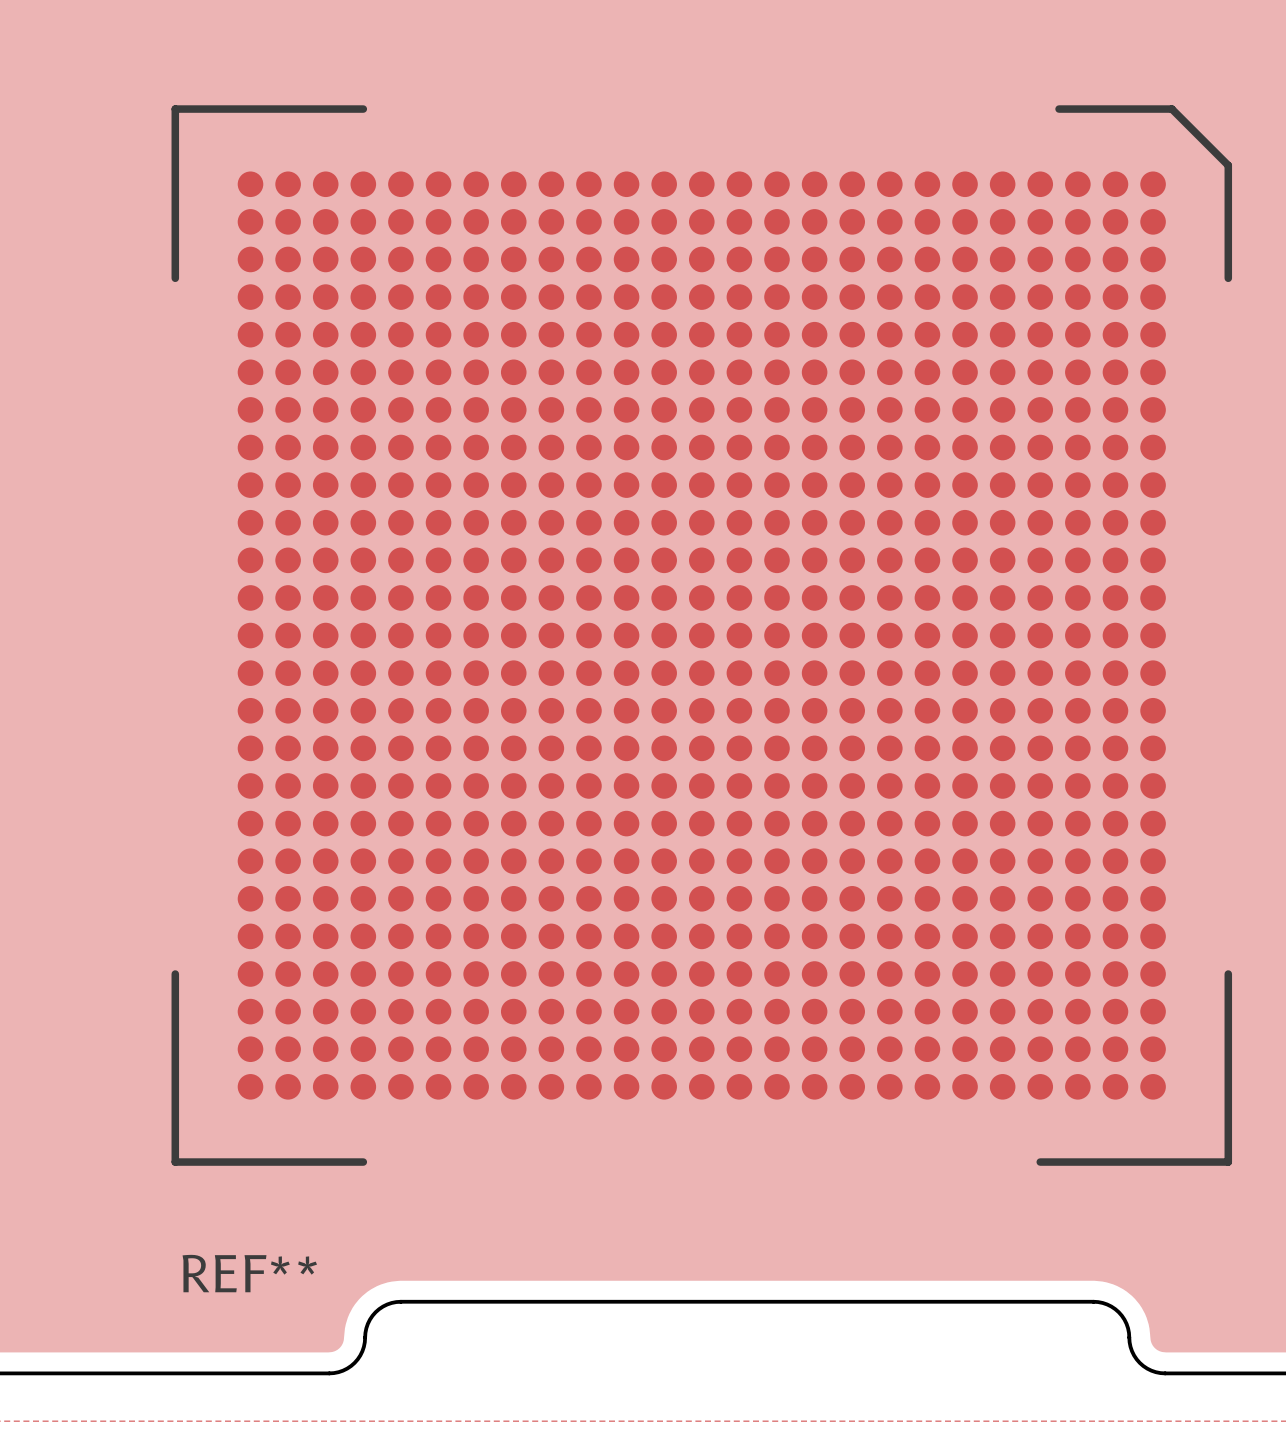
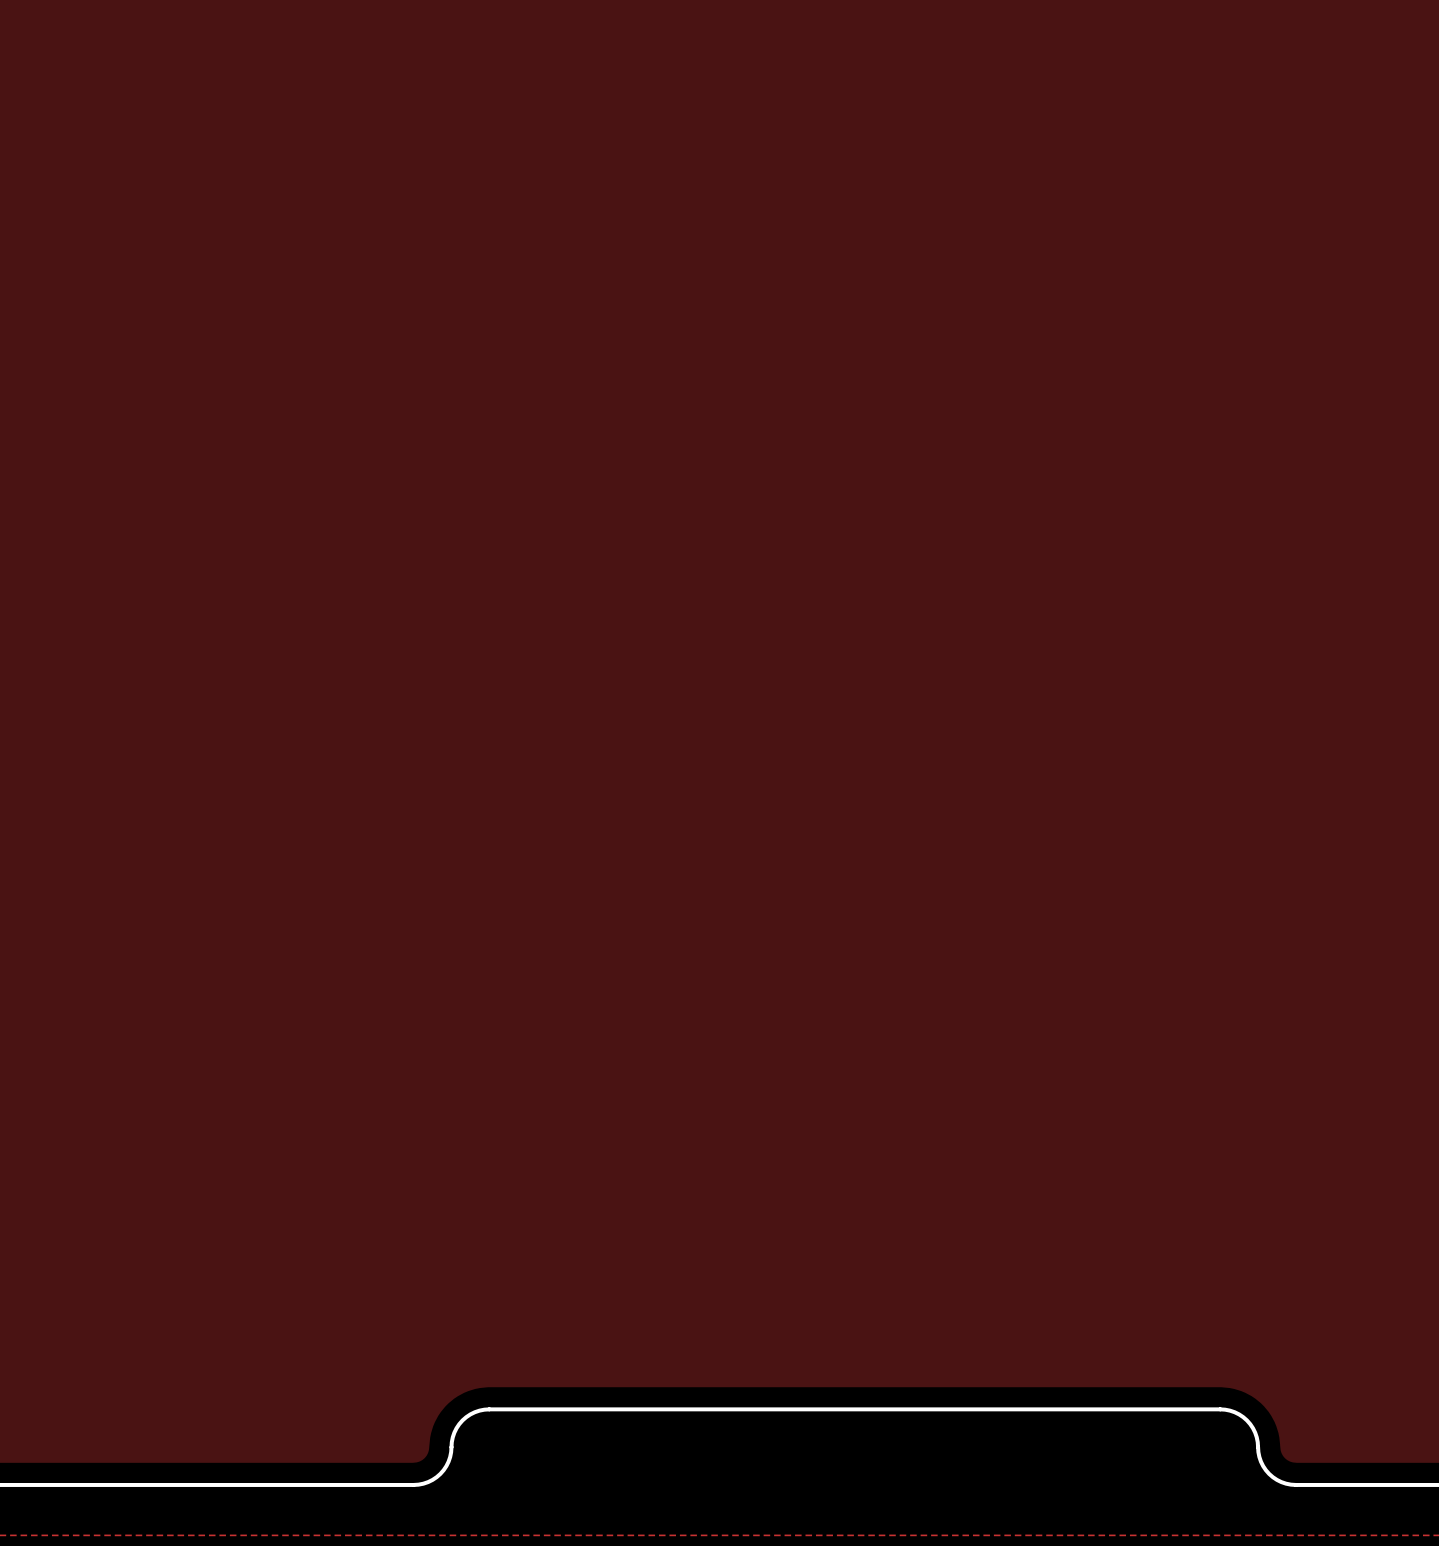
REF**: (701, 635) -> none

